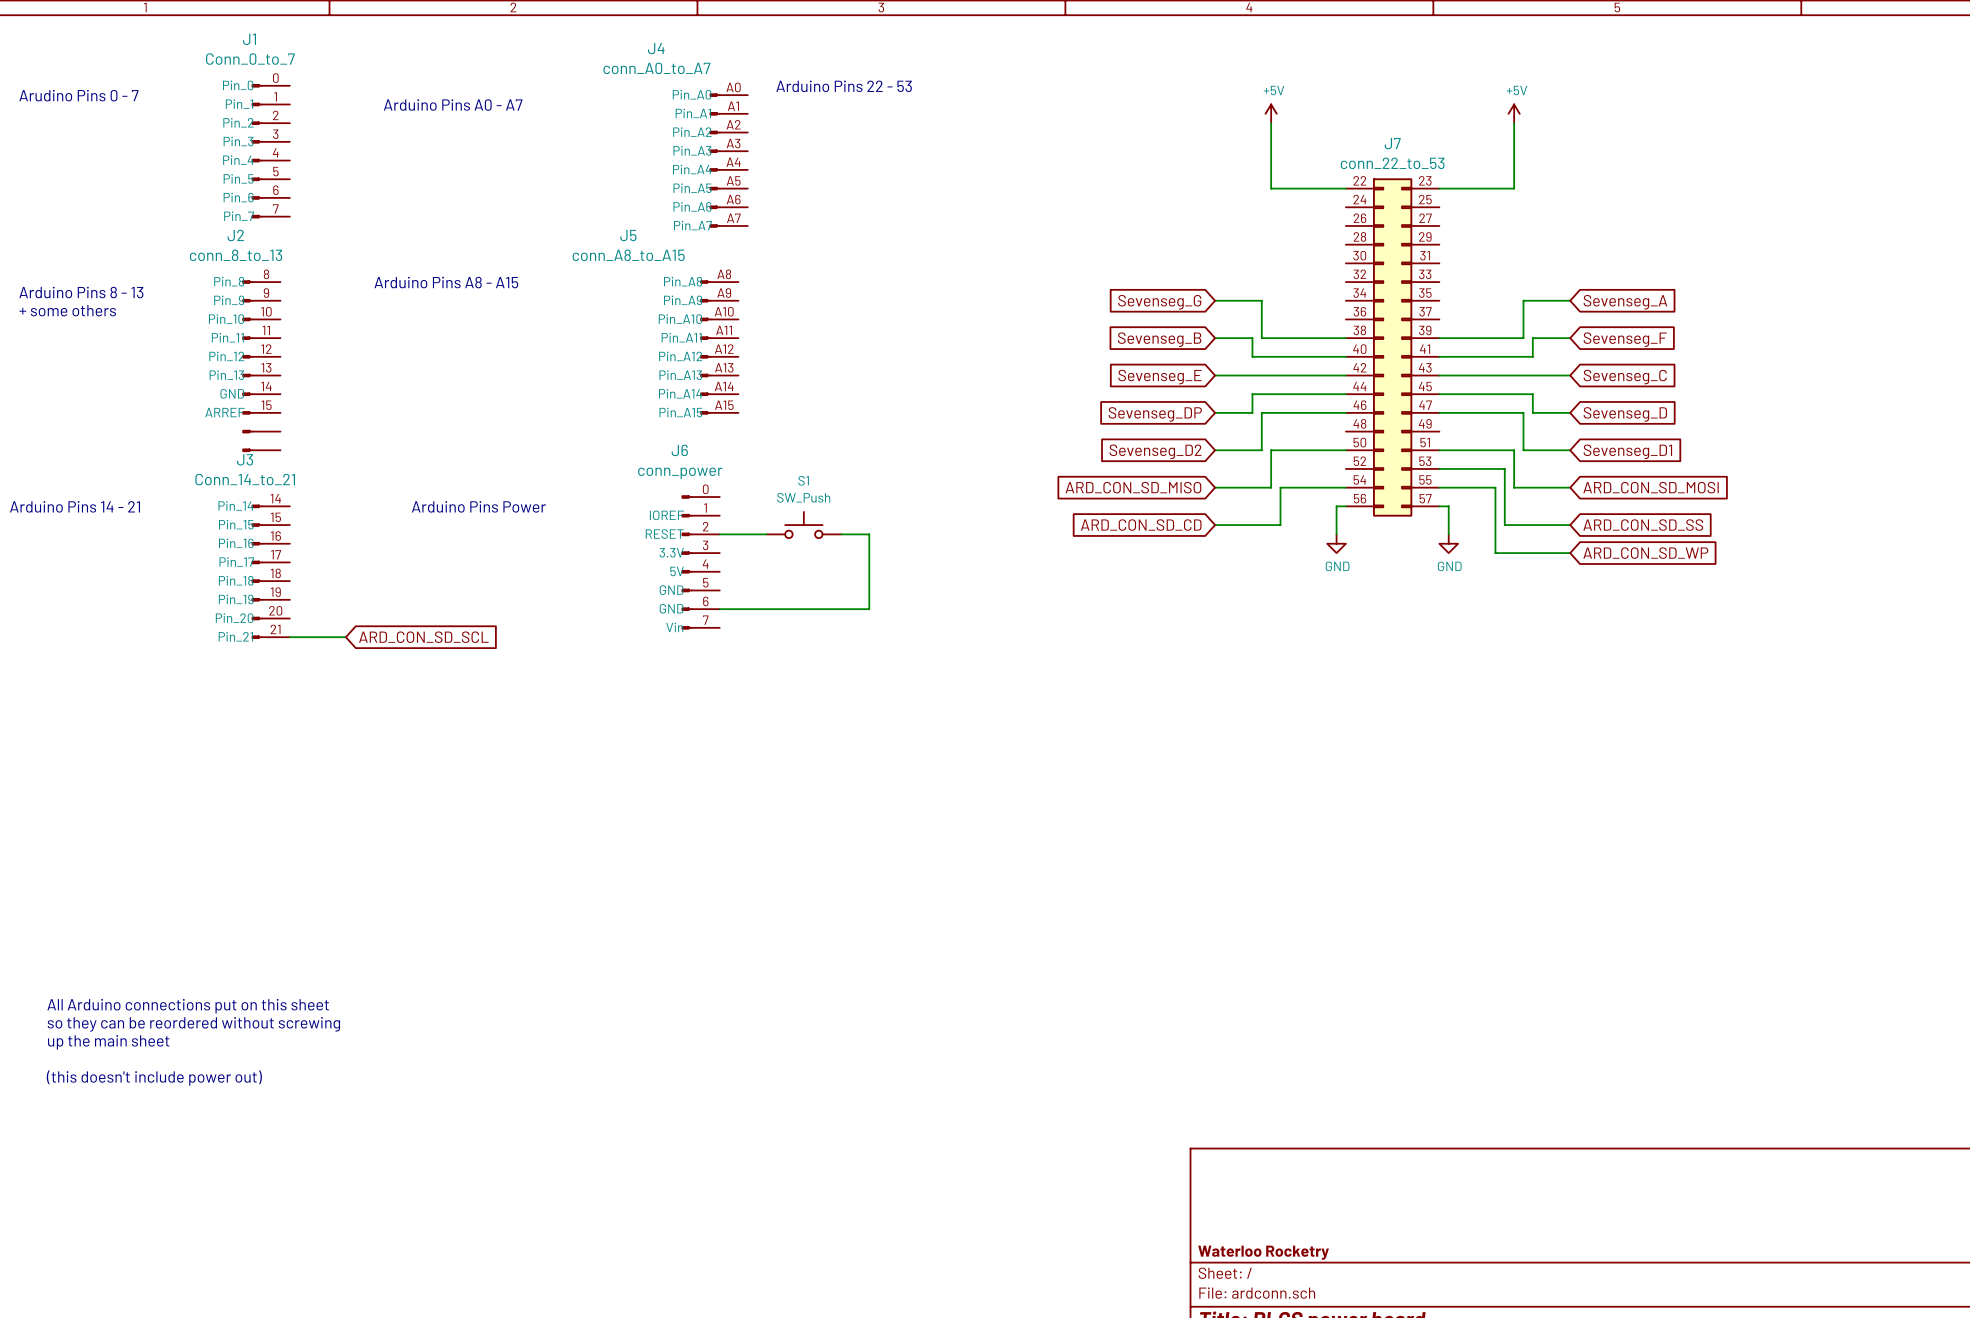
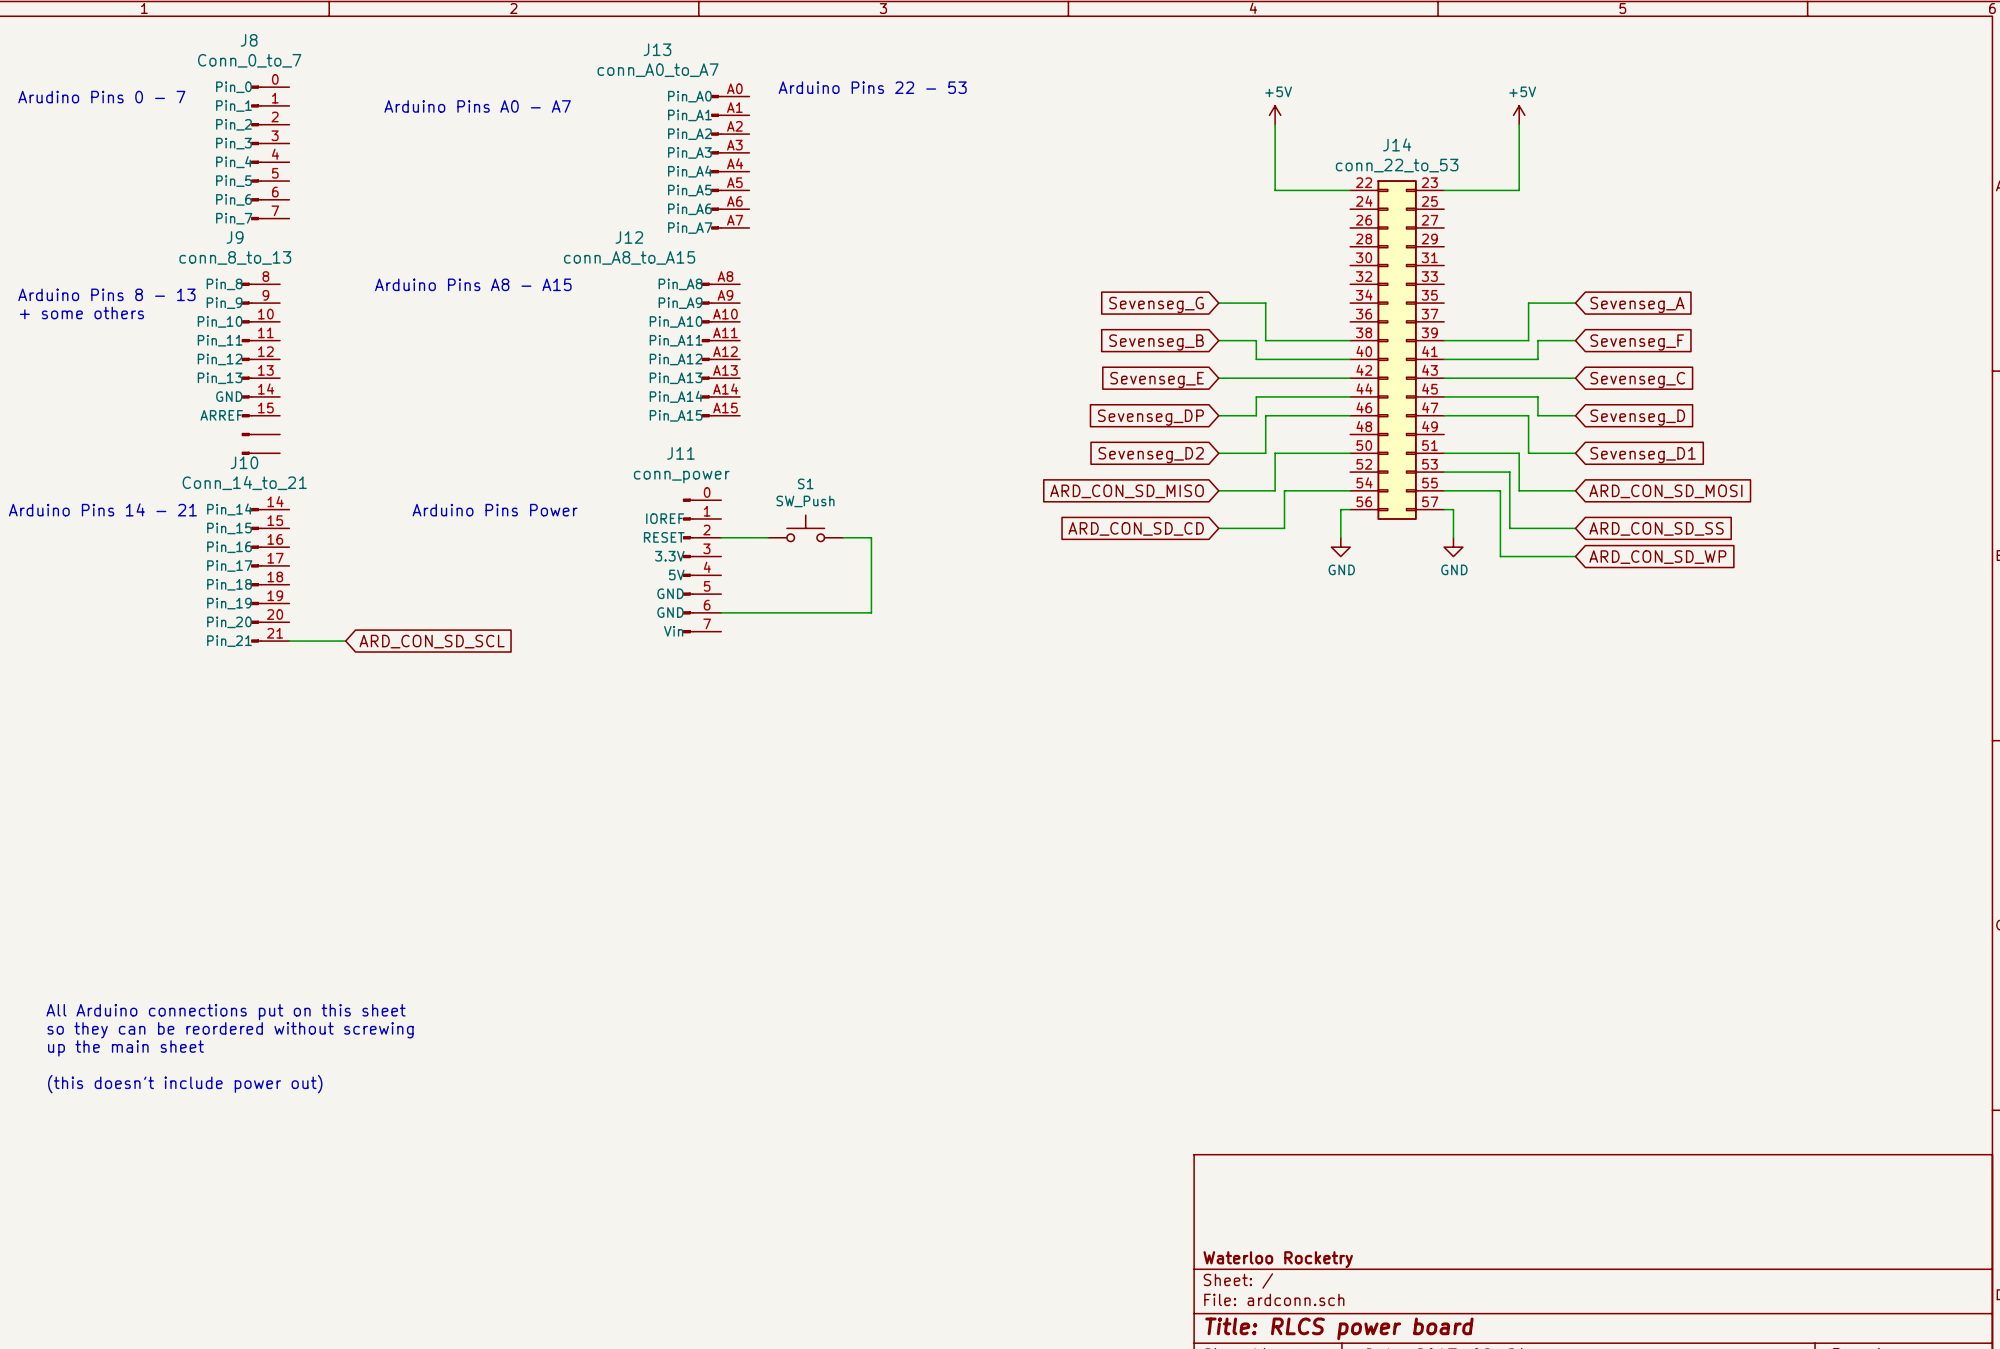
J1 name: J1 (249, 39) -> J8 (249, 40)
J4 name: J4 (656, 48) -> J13 (657, 49)
J7 name: J7 (1392, 143) -> J14 (1397, 144)
J2 name: J2 (235, 235) -> J9 (235, 237)
J5 name: J5 (628, 235) -> J12 (629, 237)
J6 name: J6 (679, 450) -> J11 (680, 453)
J3 name: J3 (245, 459) -> J10 (244, 462)

